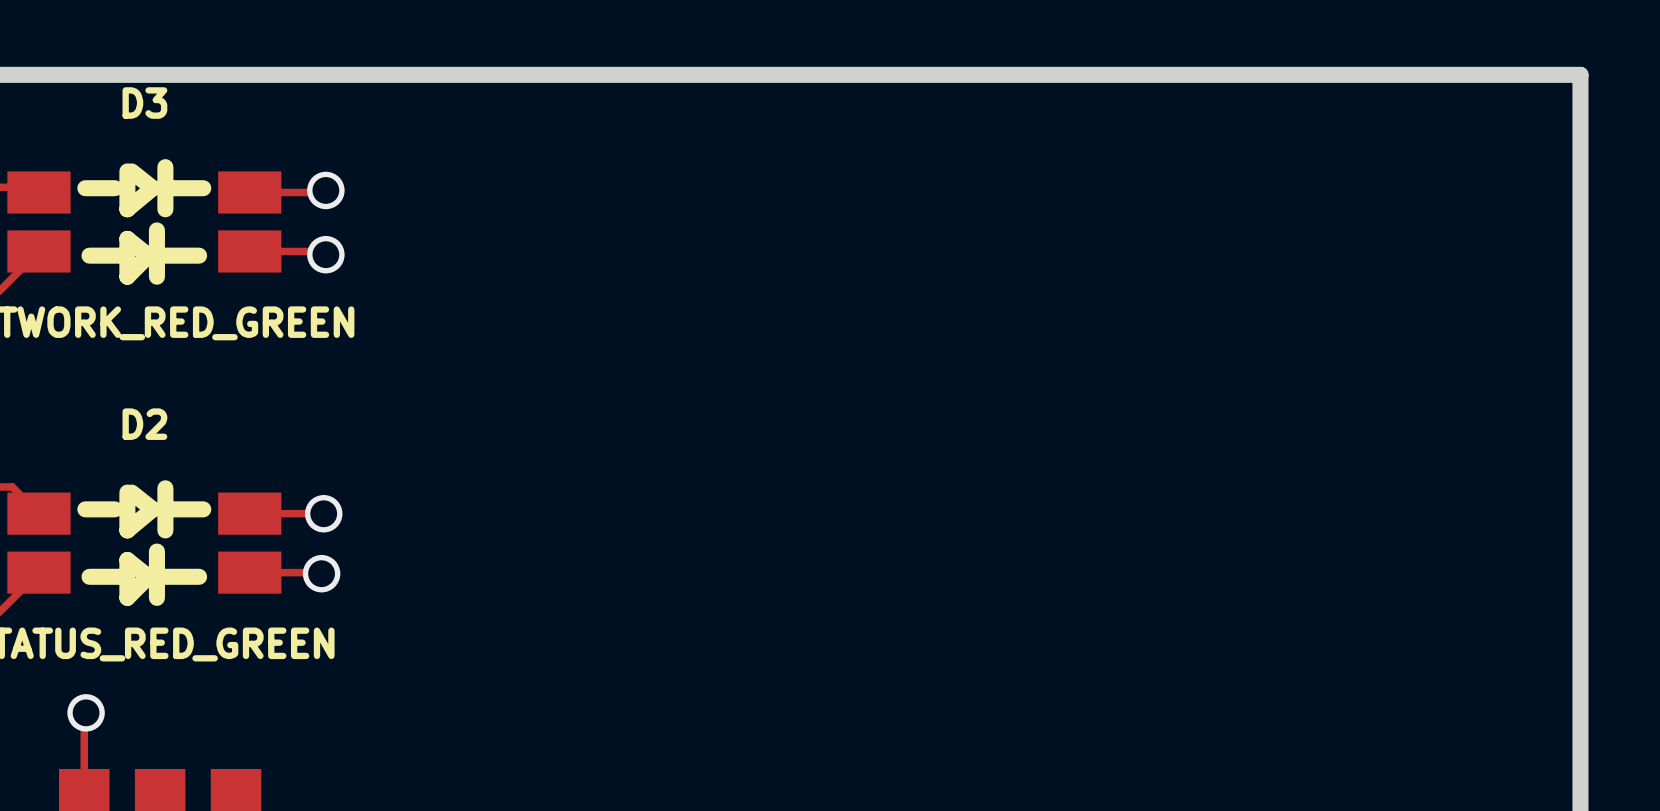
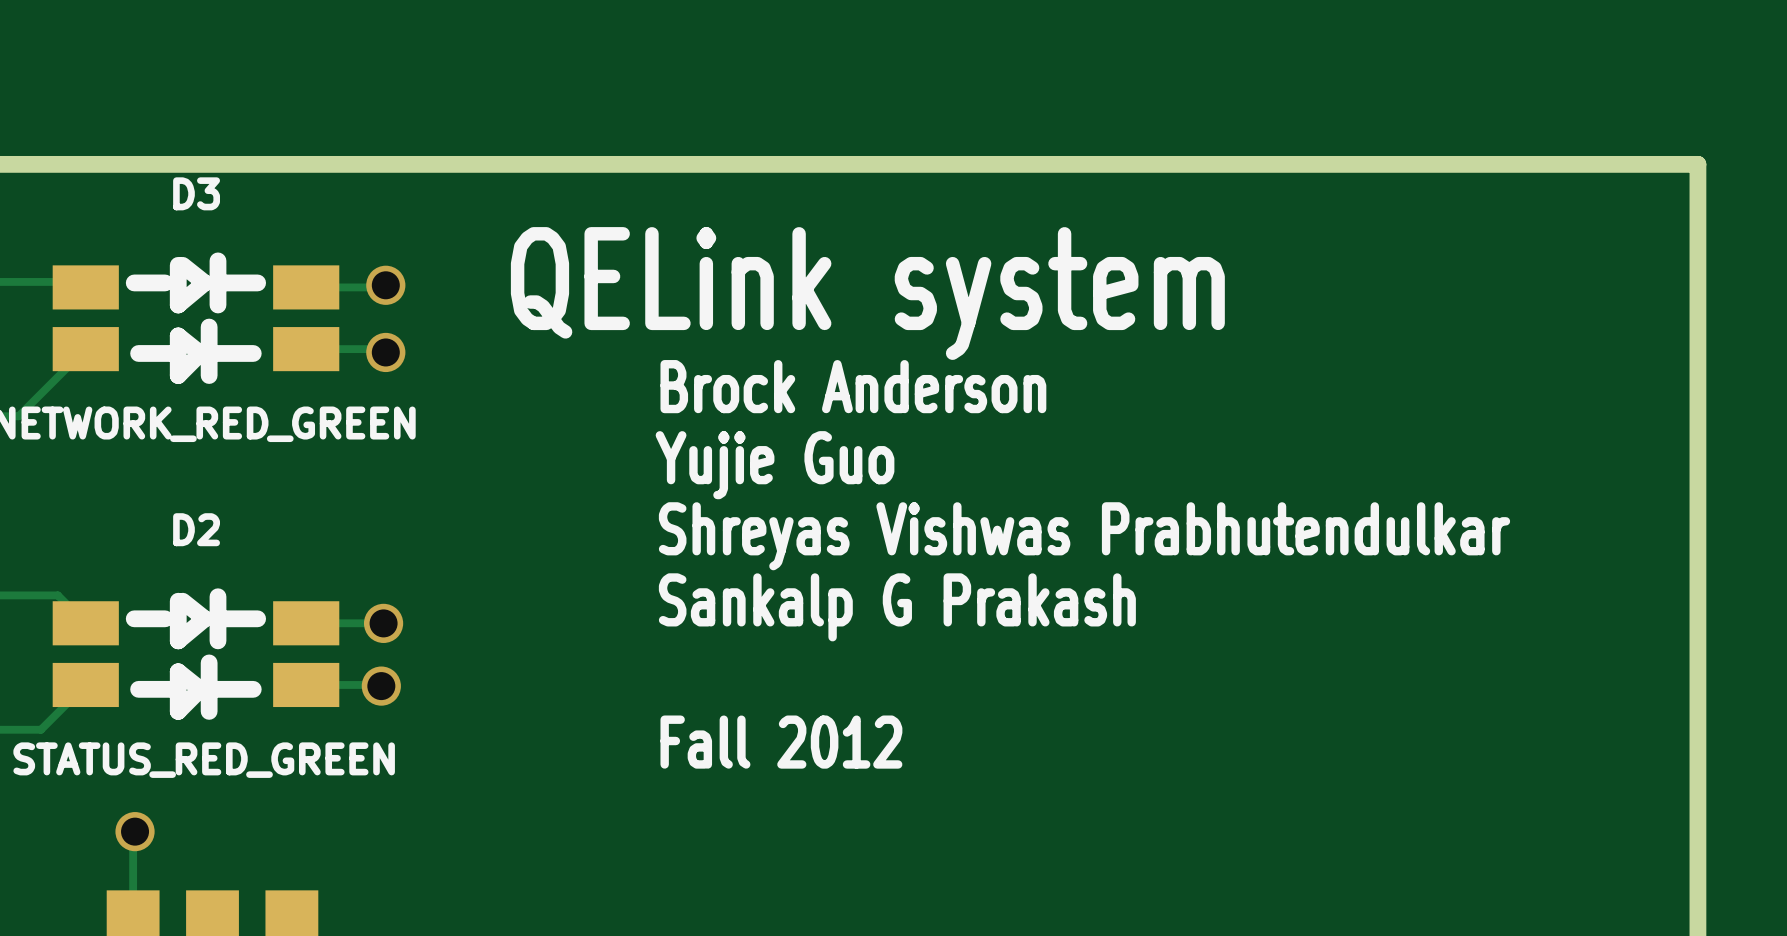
text: none -> QELink system (867, 293)
text: none -> Brock Anderson (853, 386)
text: none -> Yujie Guo (775, 465)
text: none -> Shreyas Vishwas Prabhutendulkar (1084, 536)
text: none -> Sankalp G Prakash (897, 607)
text: none -> Fall 2012 (781, 742)

